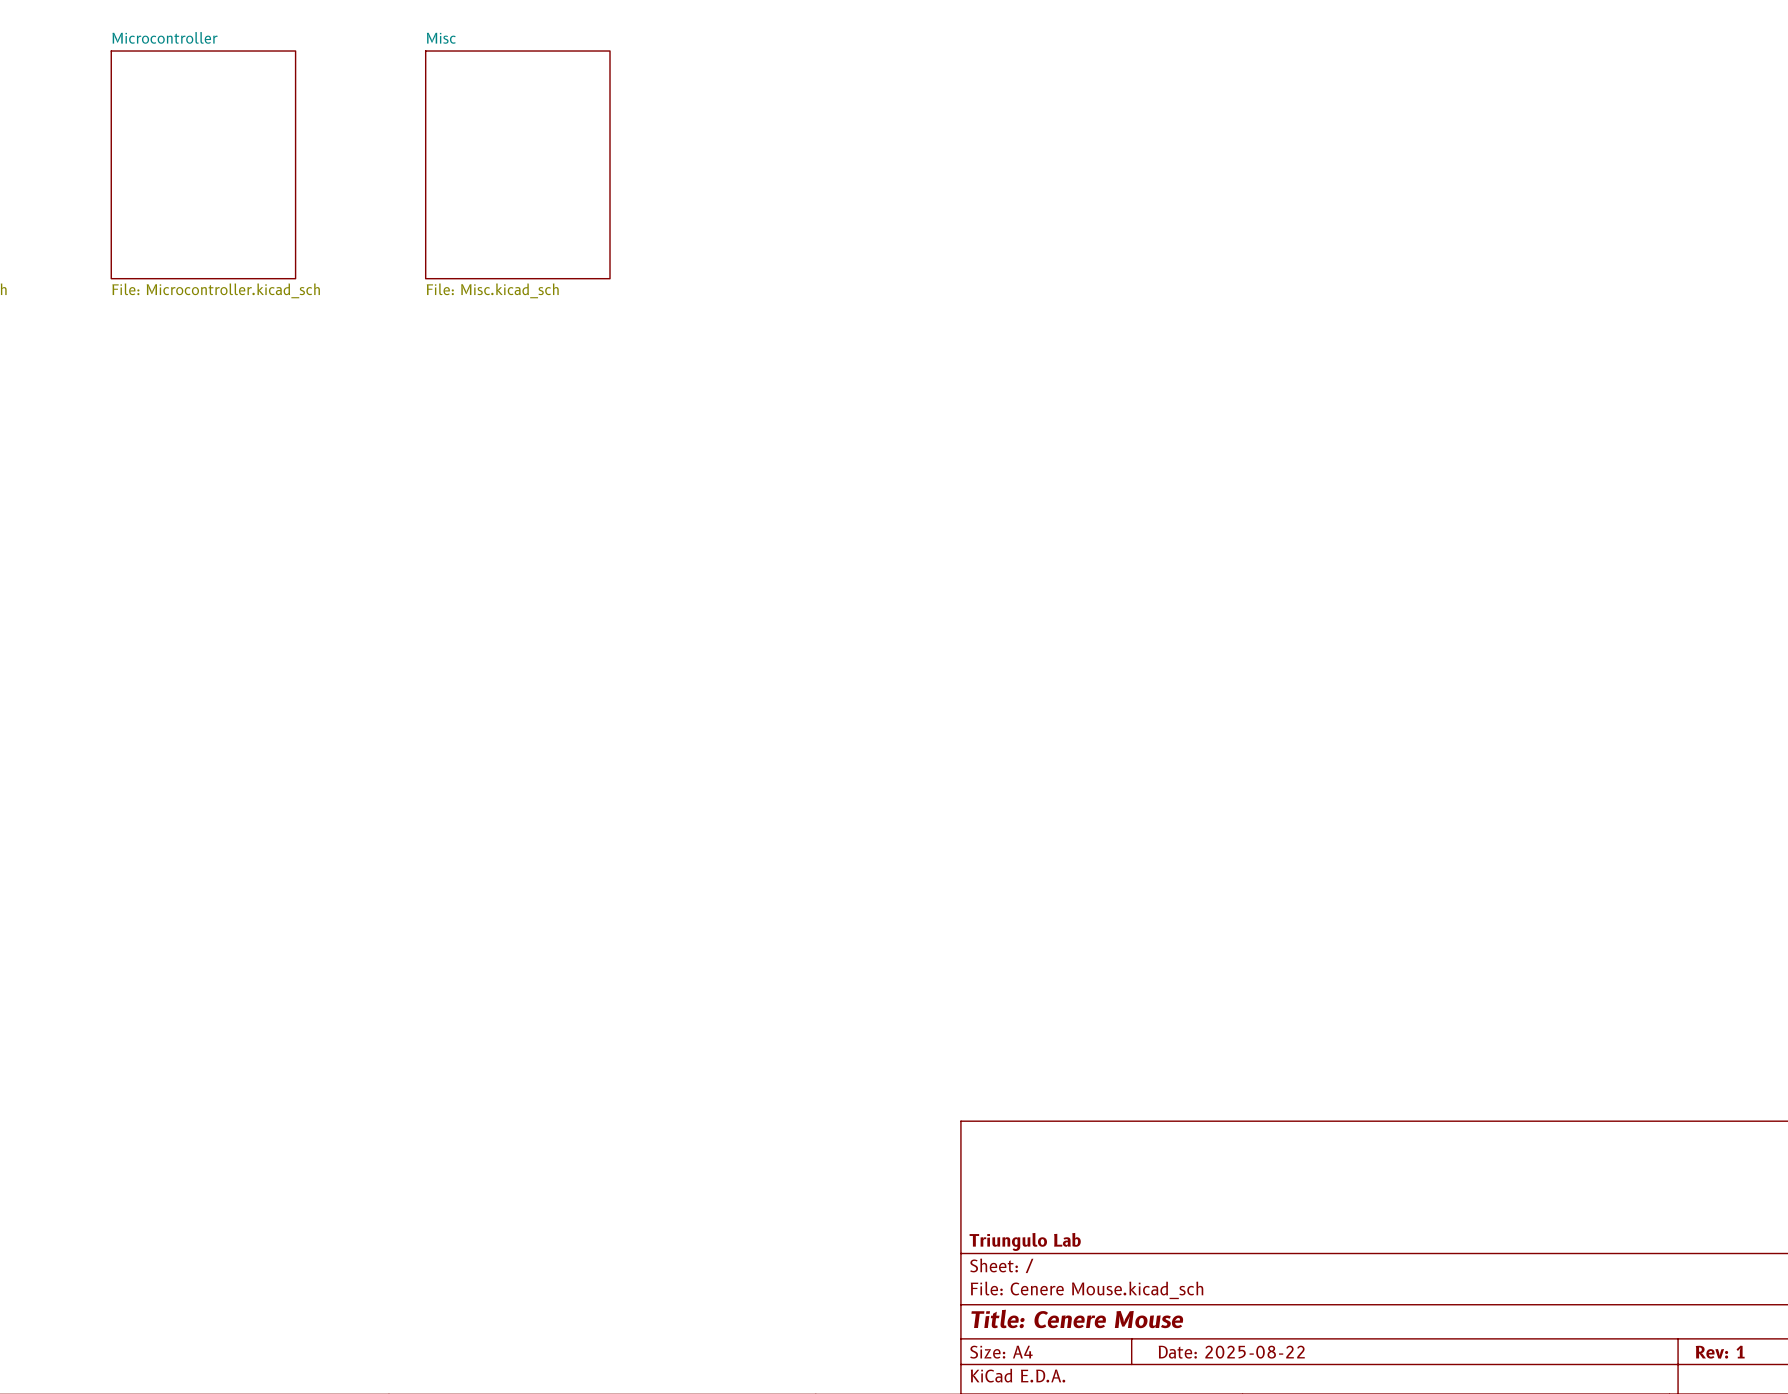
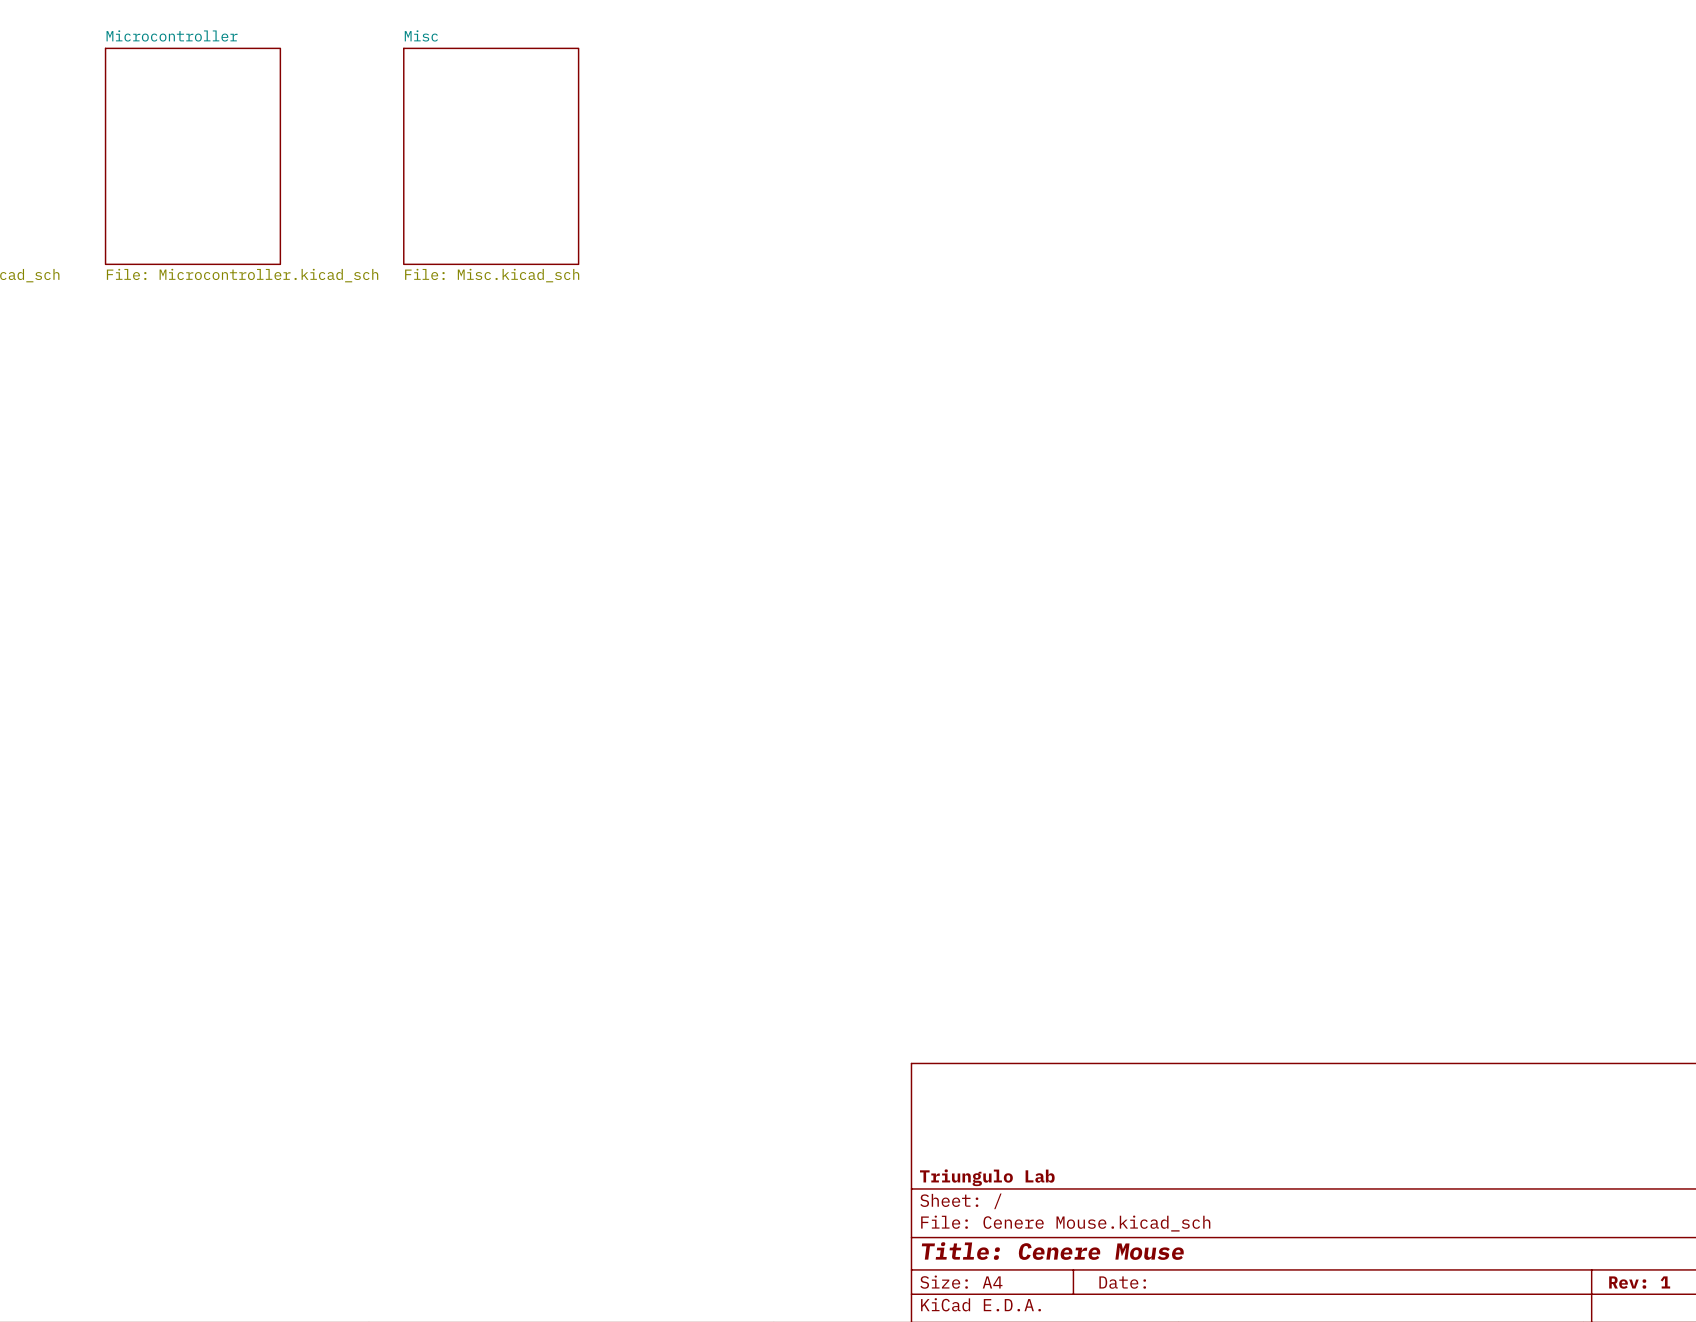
title block: Date: 2025-08-22 (1231, 1352) -> Date: (1122, 1282)

